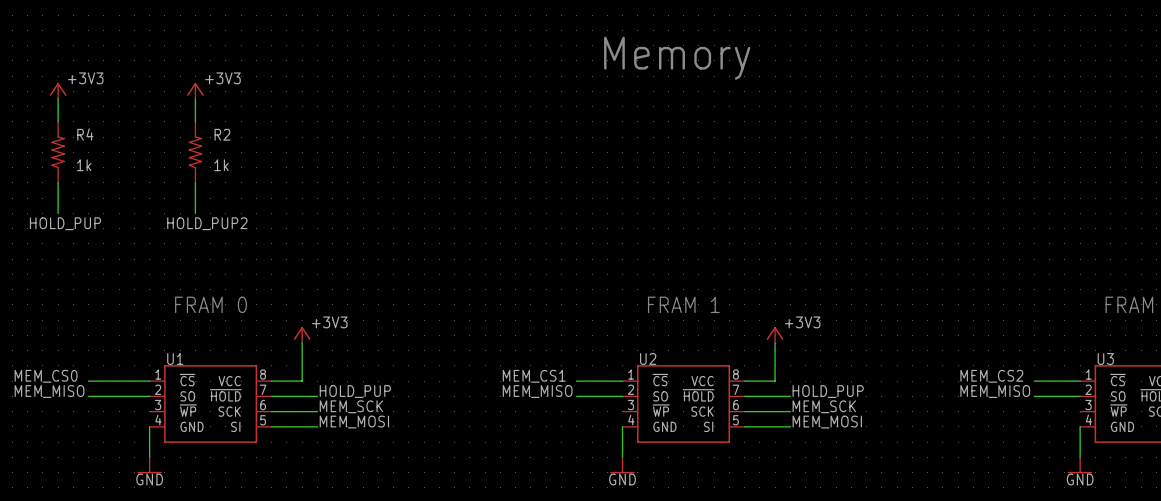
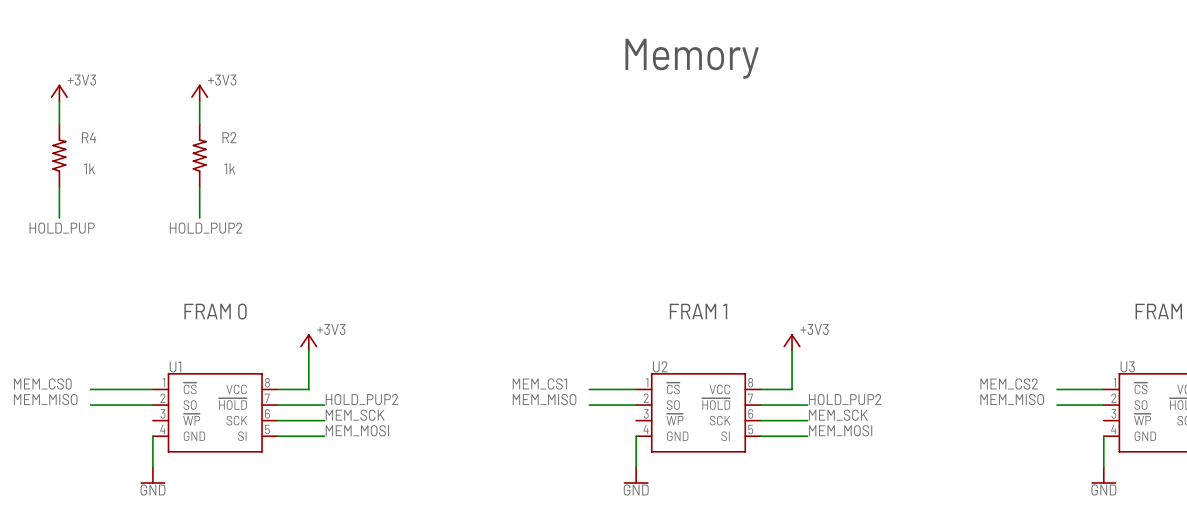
label: HOLD_PUP (355, 391) -> HOLD_PUP2 (361, 399)
label: HOLD_PUP (828, 391) -> HOLD_PUP2 (845, 399)

